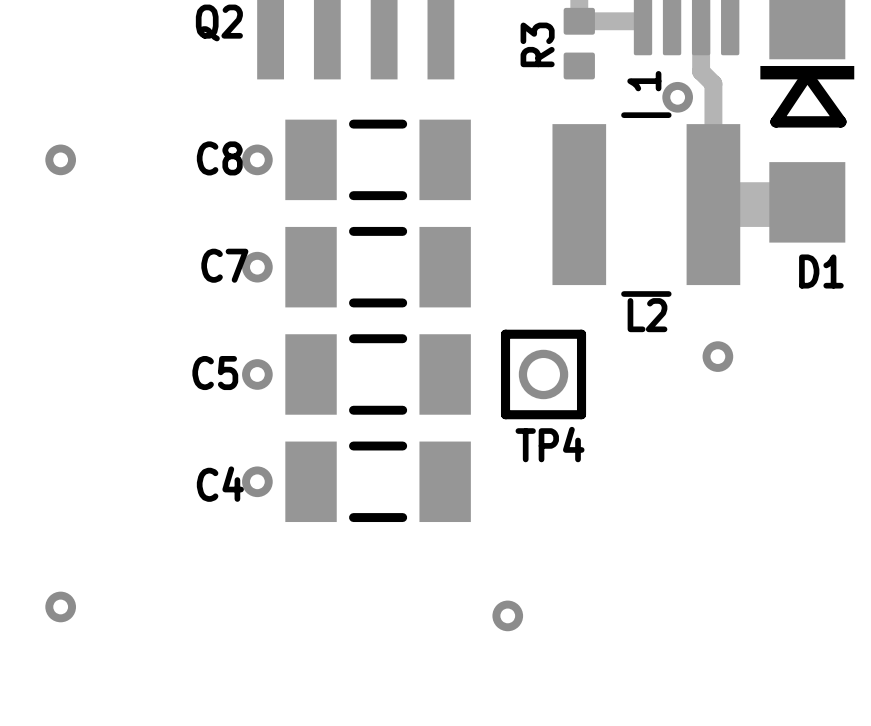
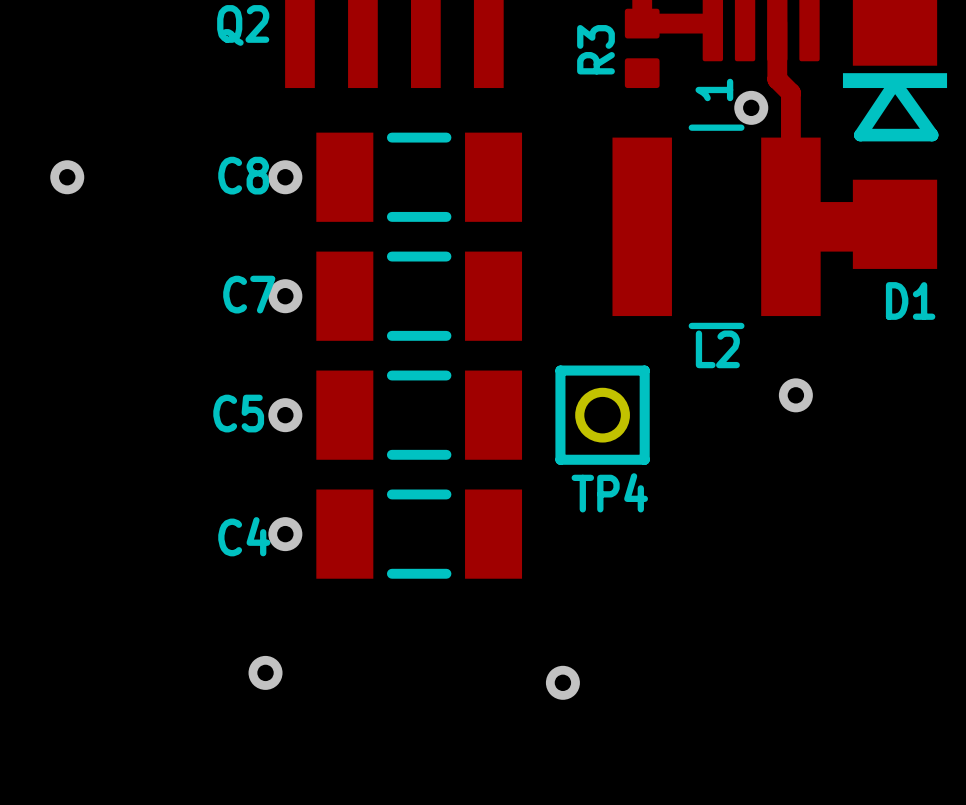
via position: (60, 606) -> (265, 672)

